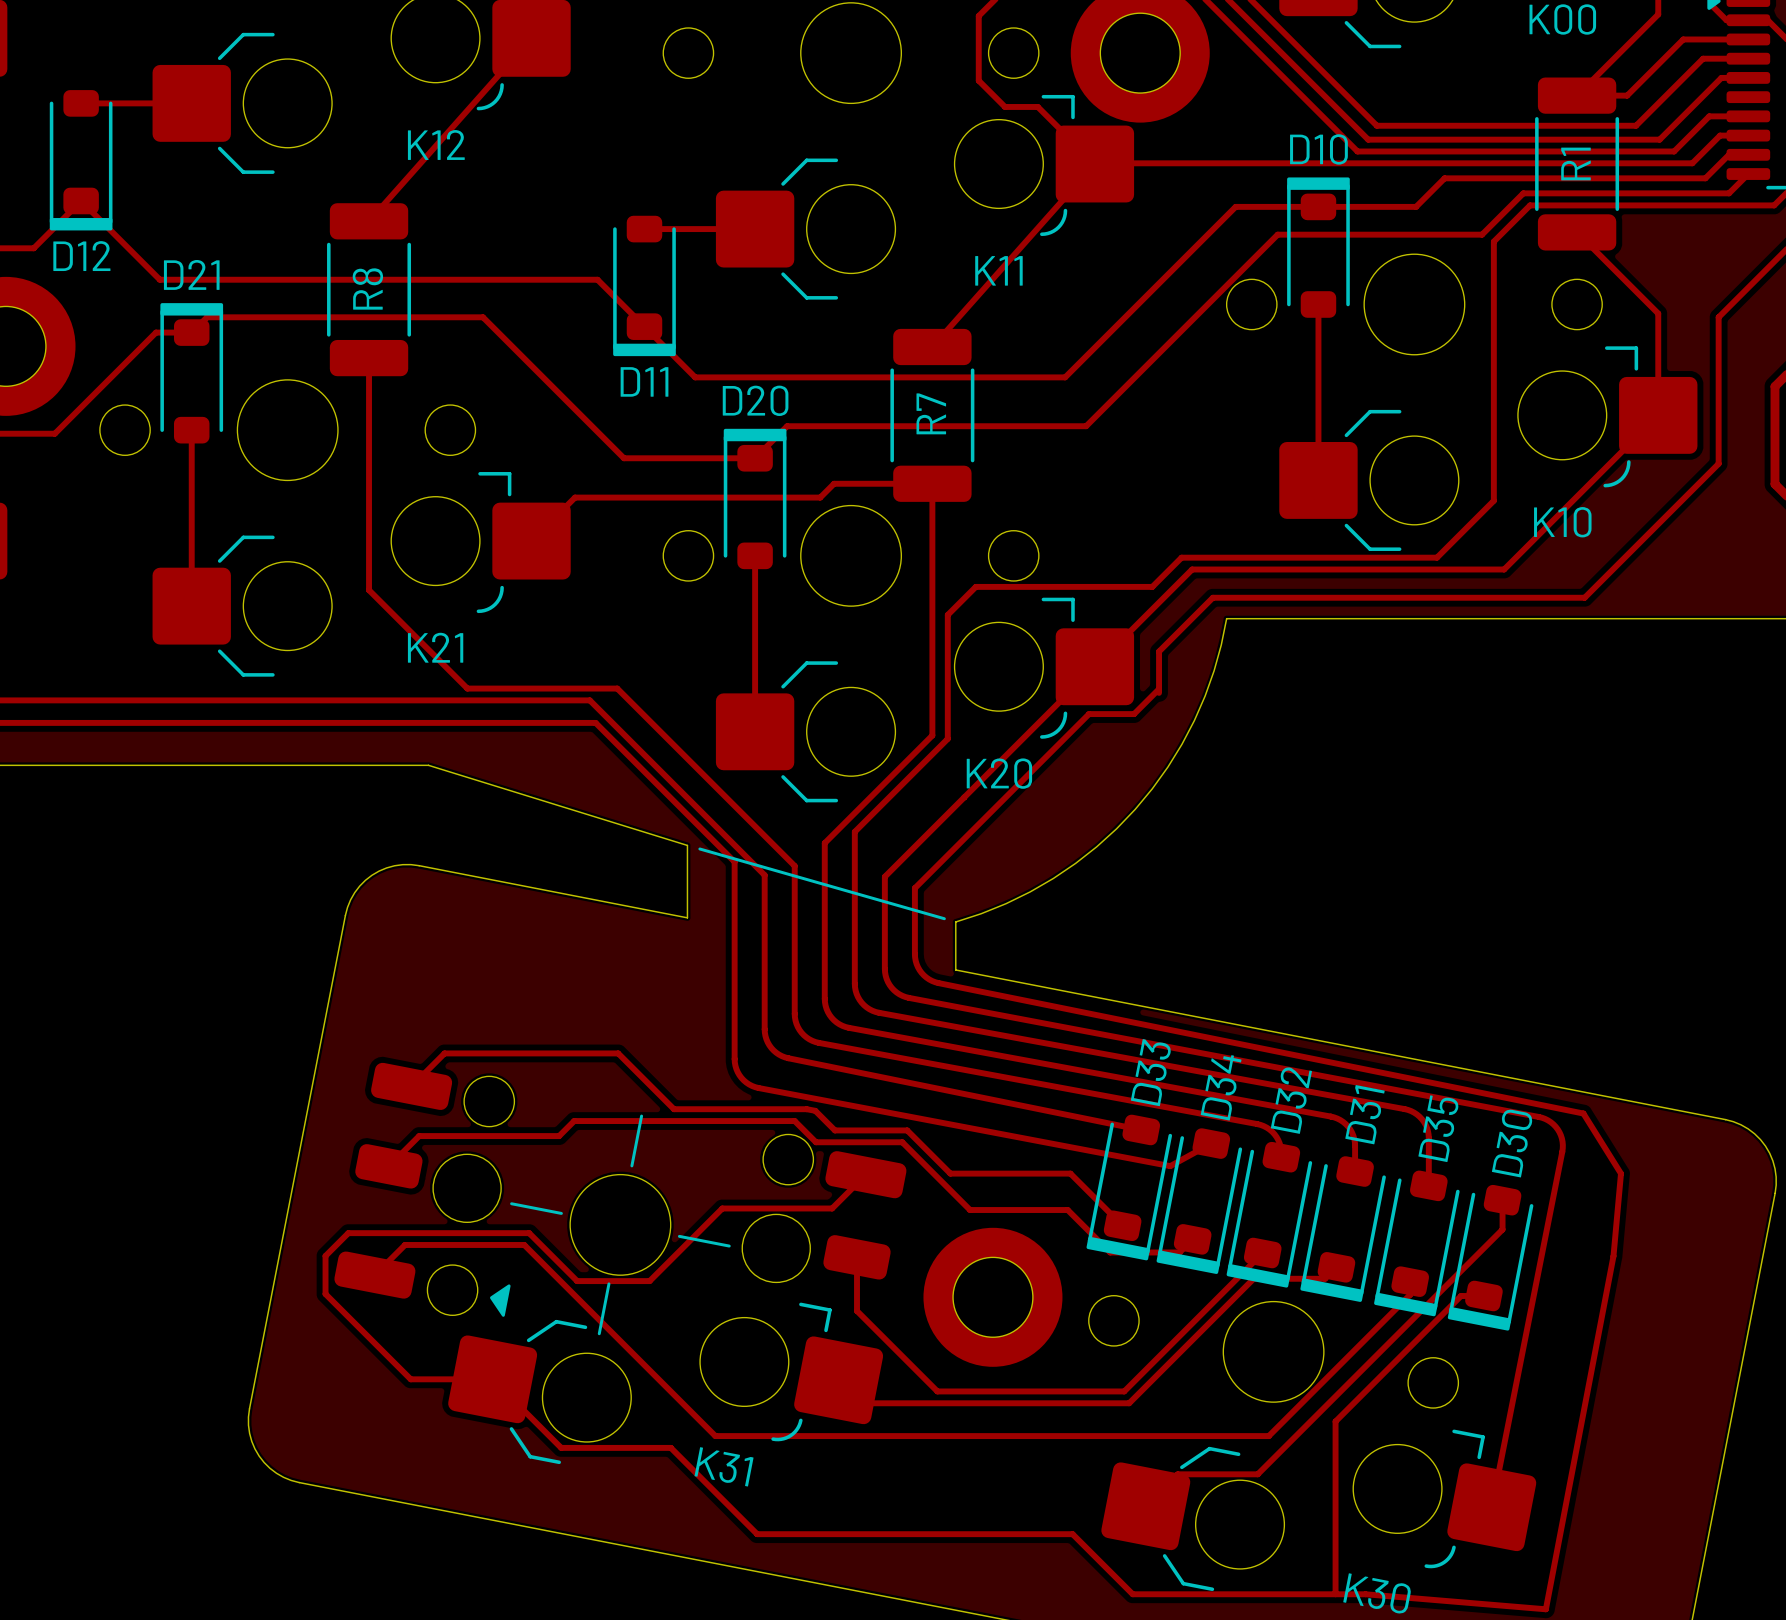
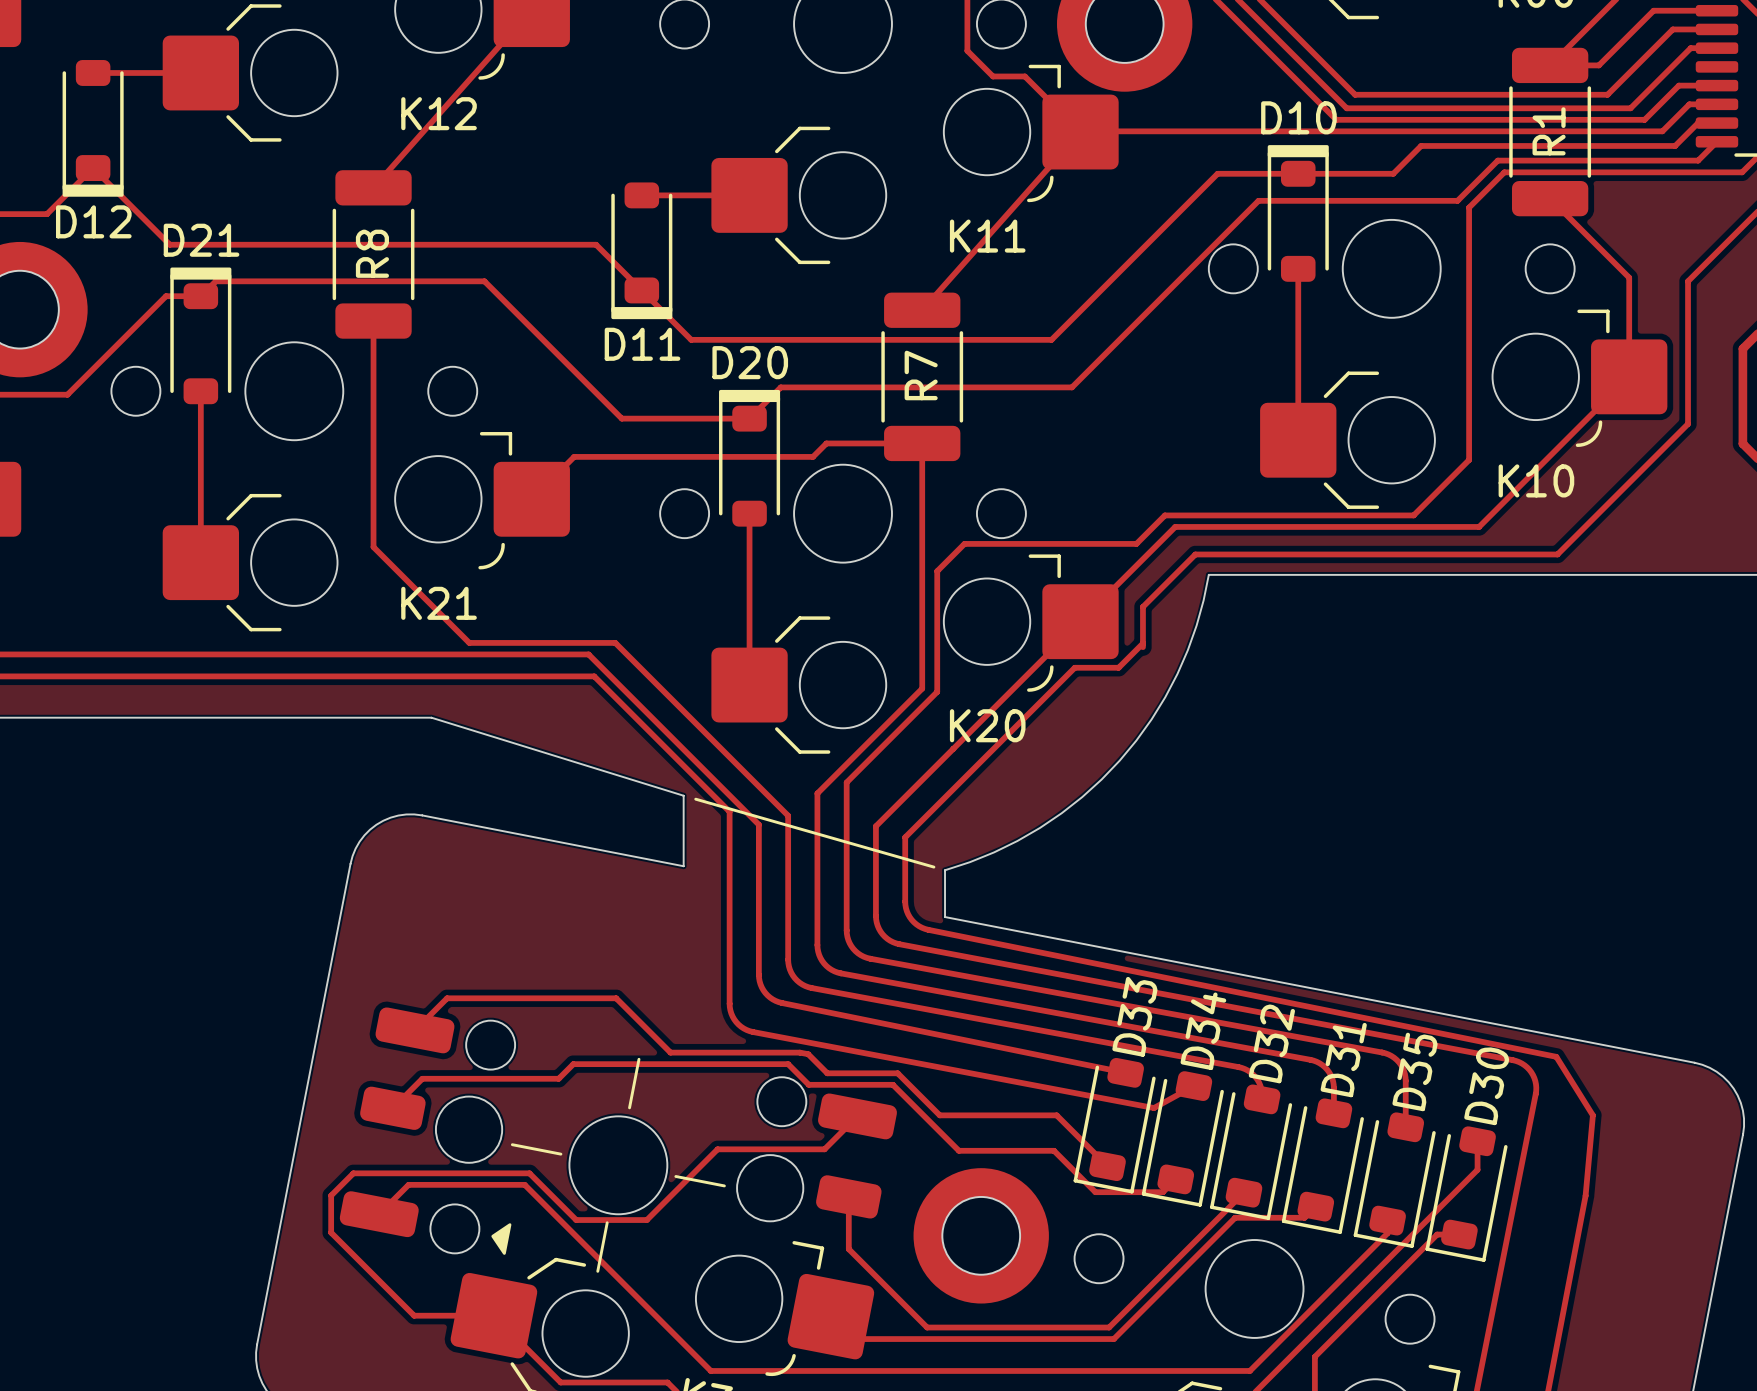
D33 footprint: [1086, 1114, 1173, 1261] -> [1073, 1057, 1156, 1194]
D34 footprint: [1156, 1128, 1243, 1274] -> [1141, 1071, 1224, 1207]
D32 footprint: [1226, 1141, 1313, 1288] -> [1210, 1084, 1293, 1220]
D31 footprint: [1300, 1156, 1386, 1302] -> [1281, 1098, 1364, 1234]
D35 footprint: [1374, 1170, 1460, 1317] -> [1353, 1112, 1436, 1248]
D30 footprint: [1447, 1184, 1534, 1331] -> [1425, 1126, 1508, 1262]

